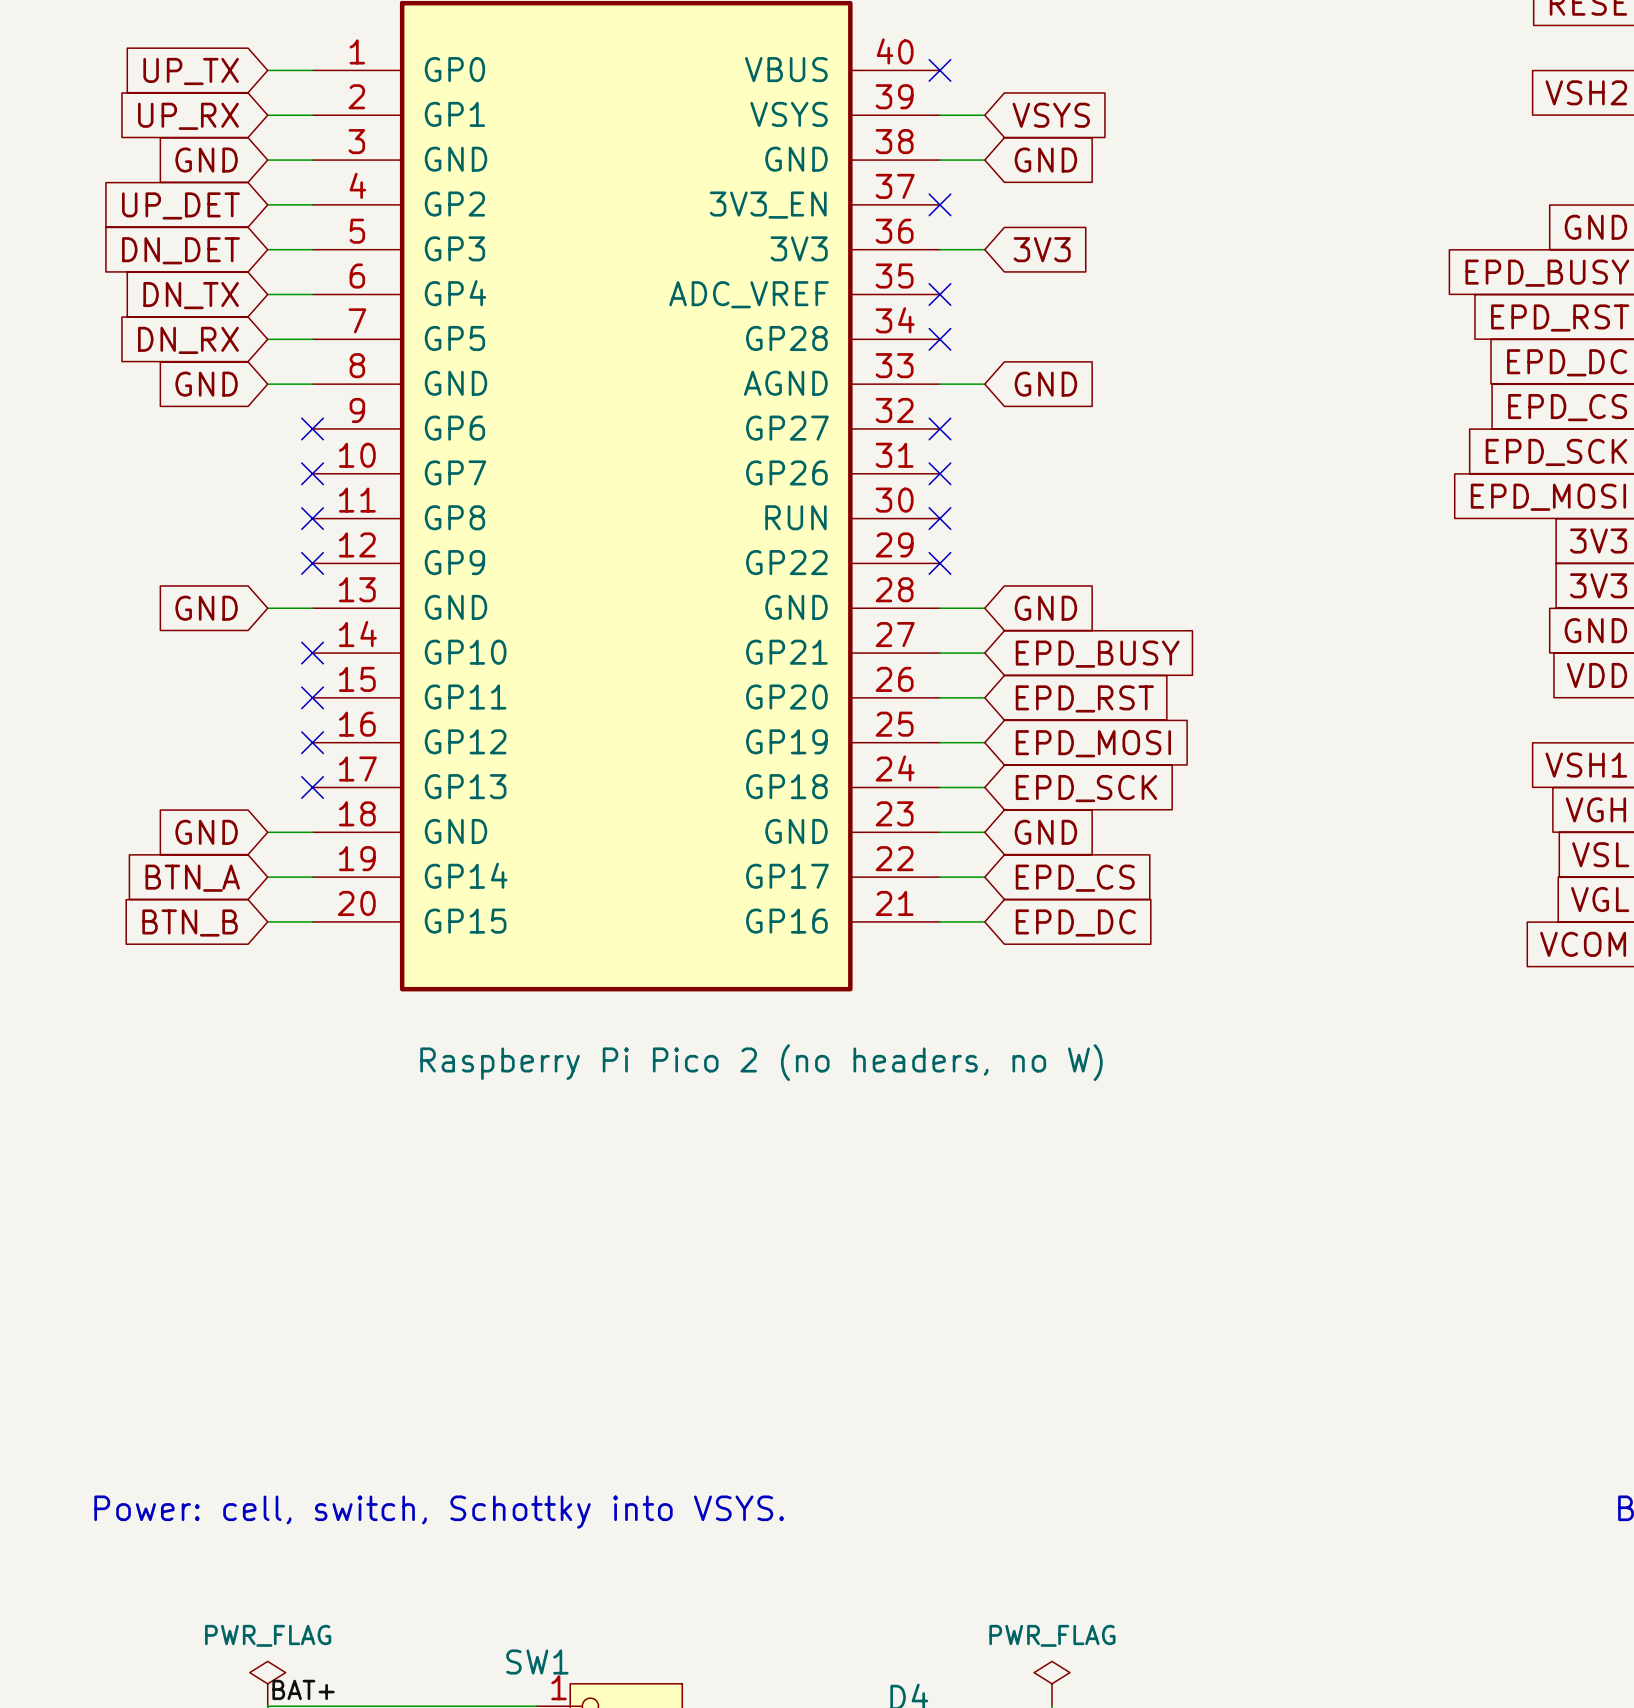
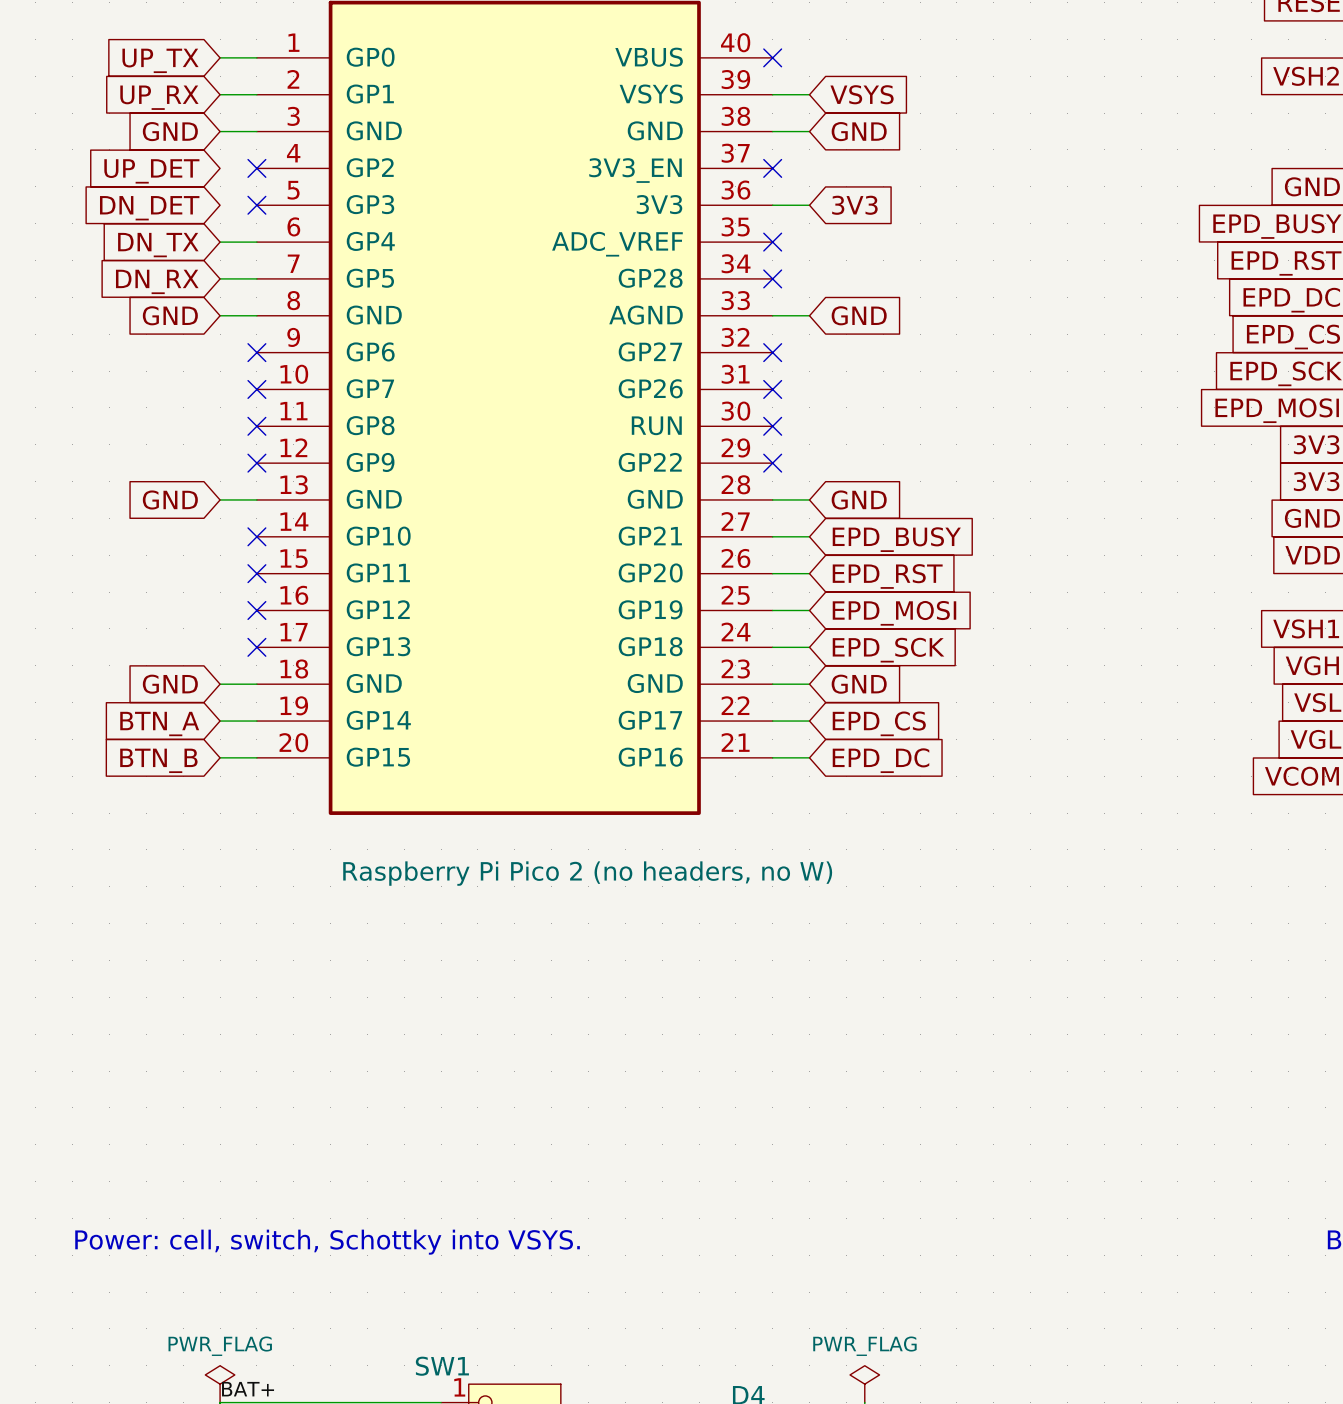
wire: (267, 204) (312, 204) -> none
no-connect mark: none -> (256, 168)
wire: (267, 249) (312, 249) -> none
no-connect mark: none -> (256, 205)

